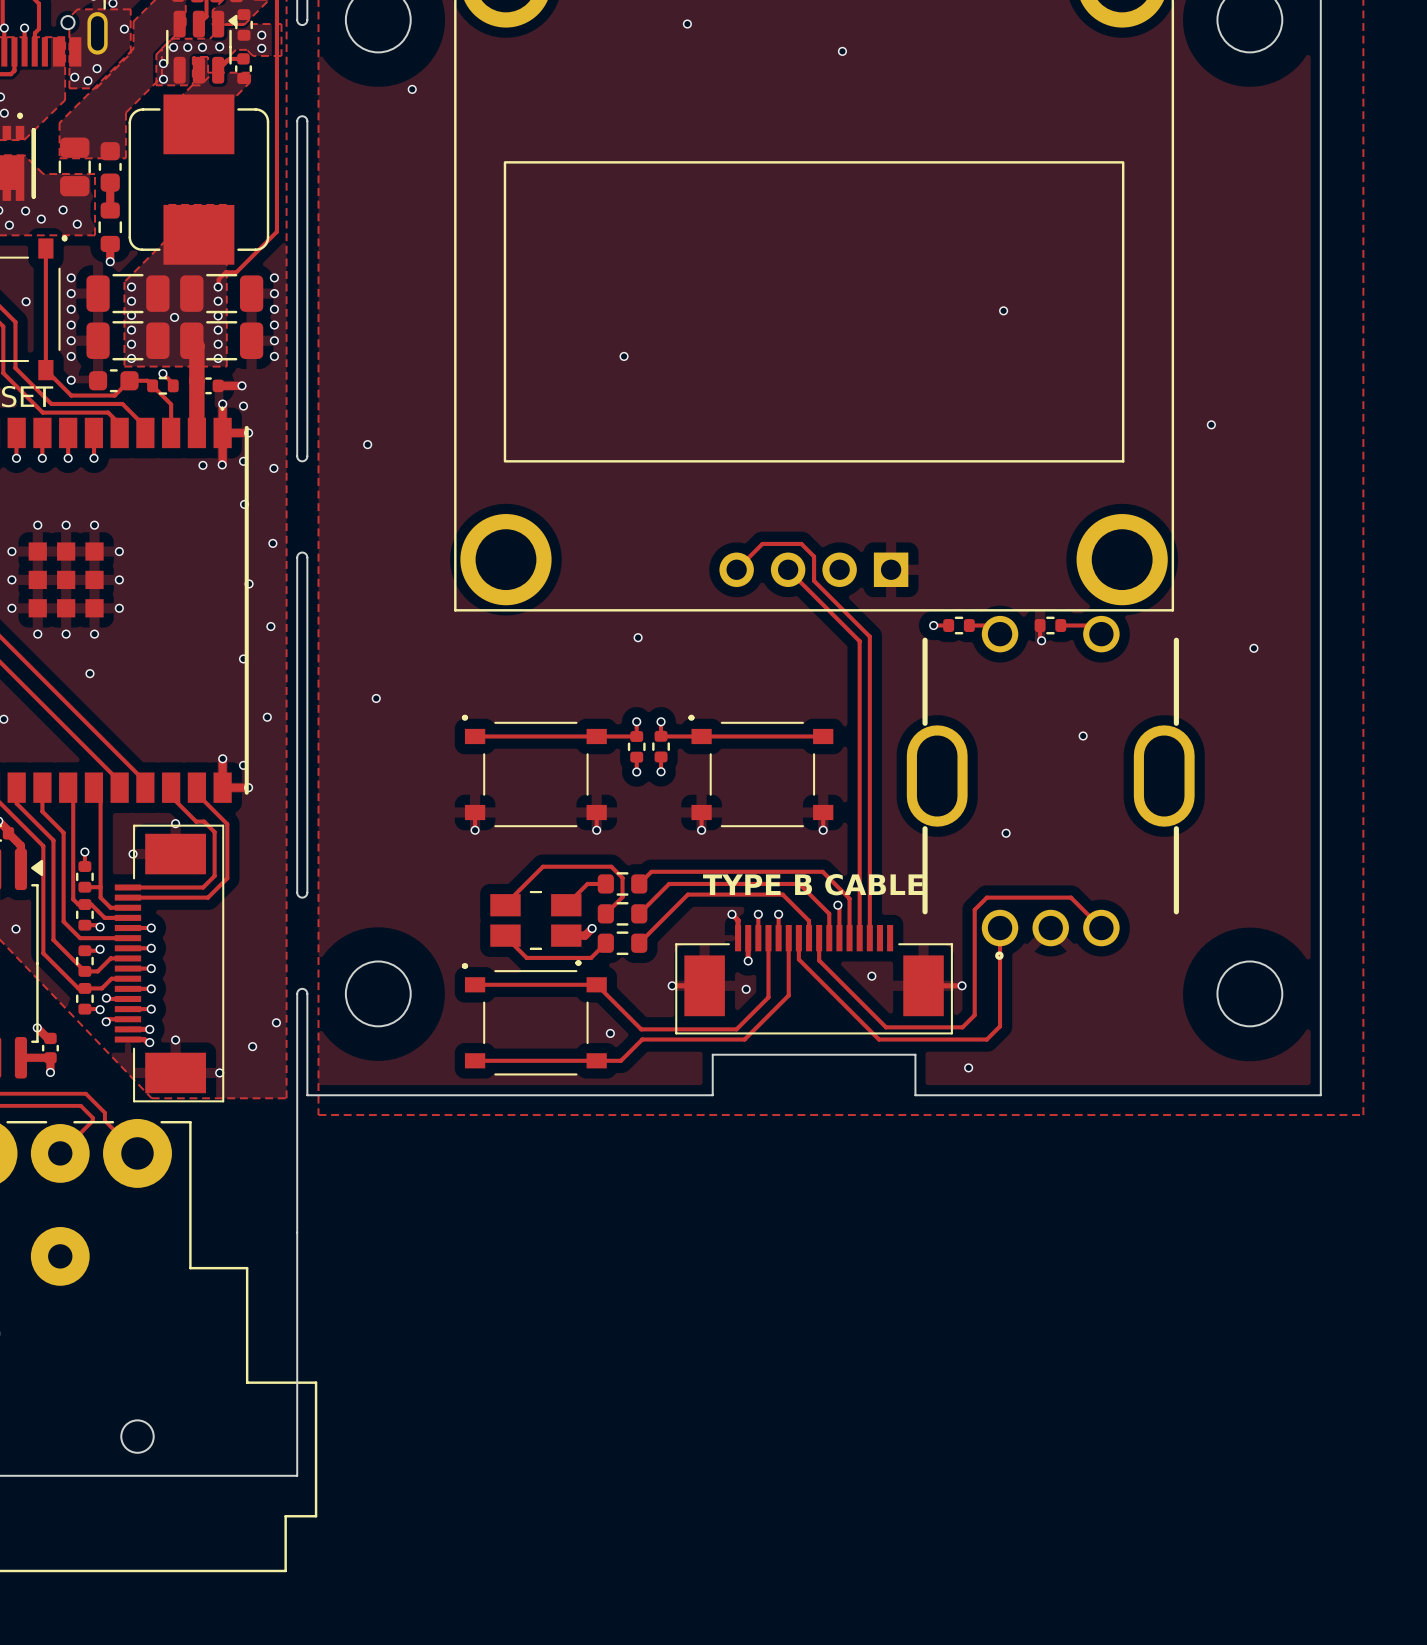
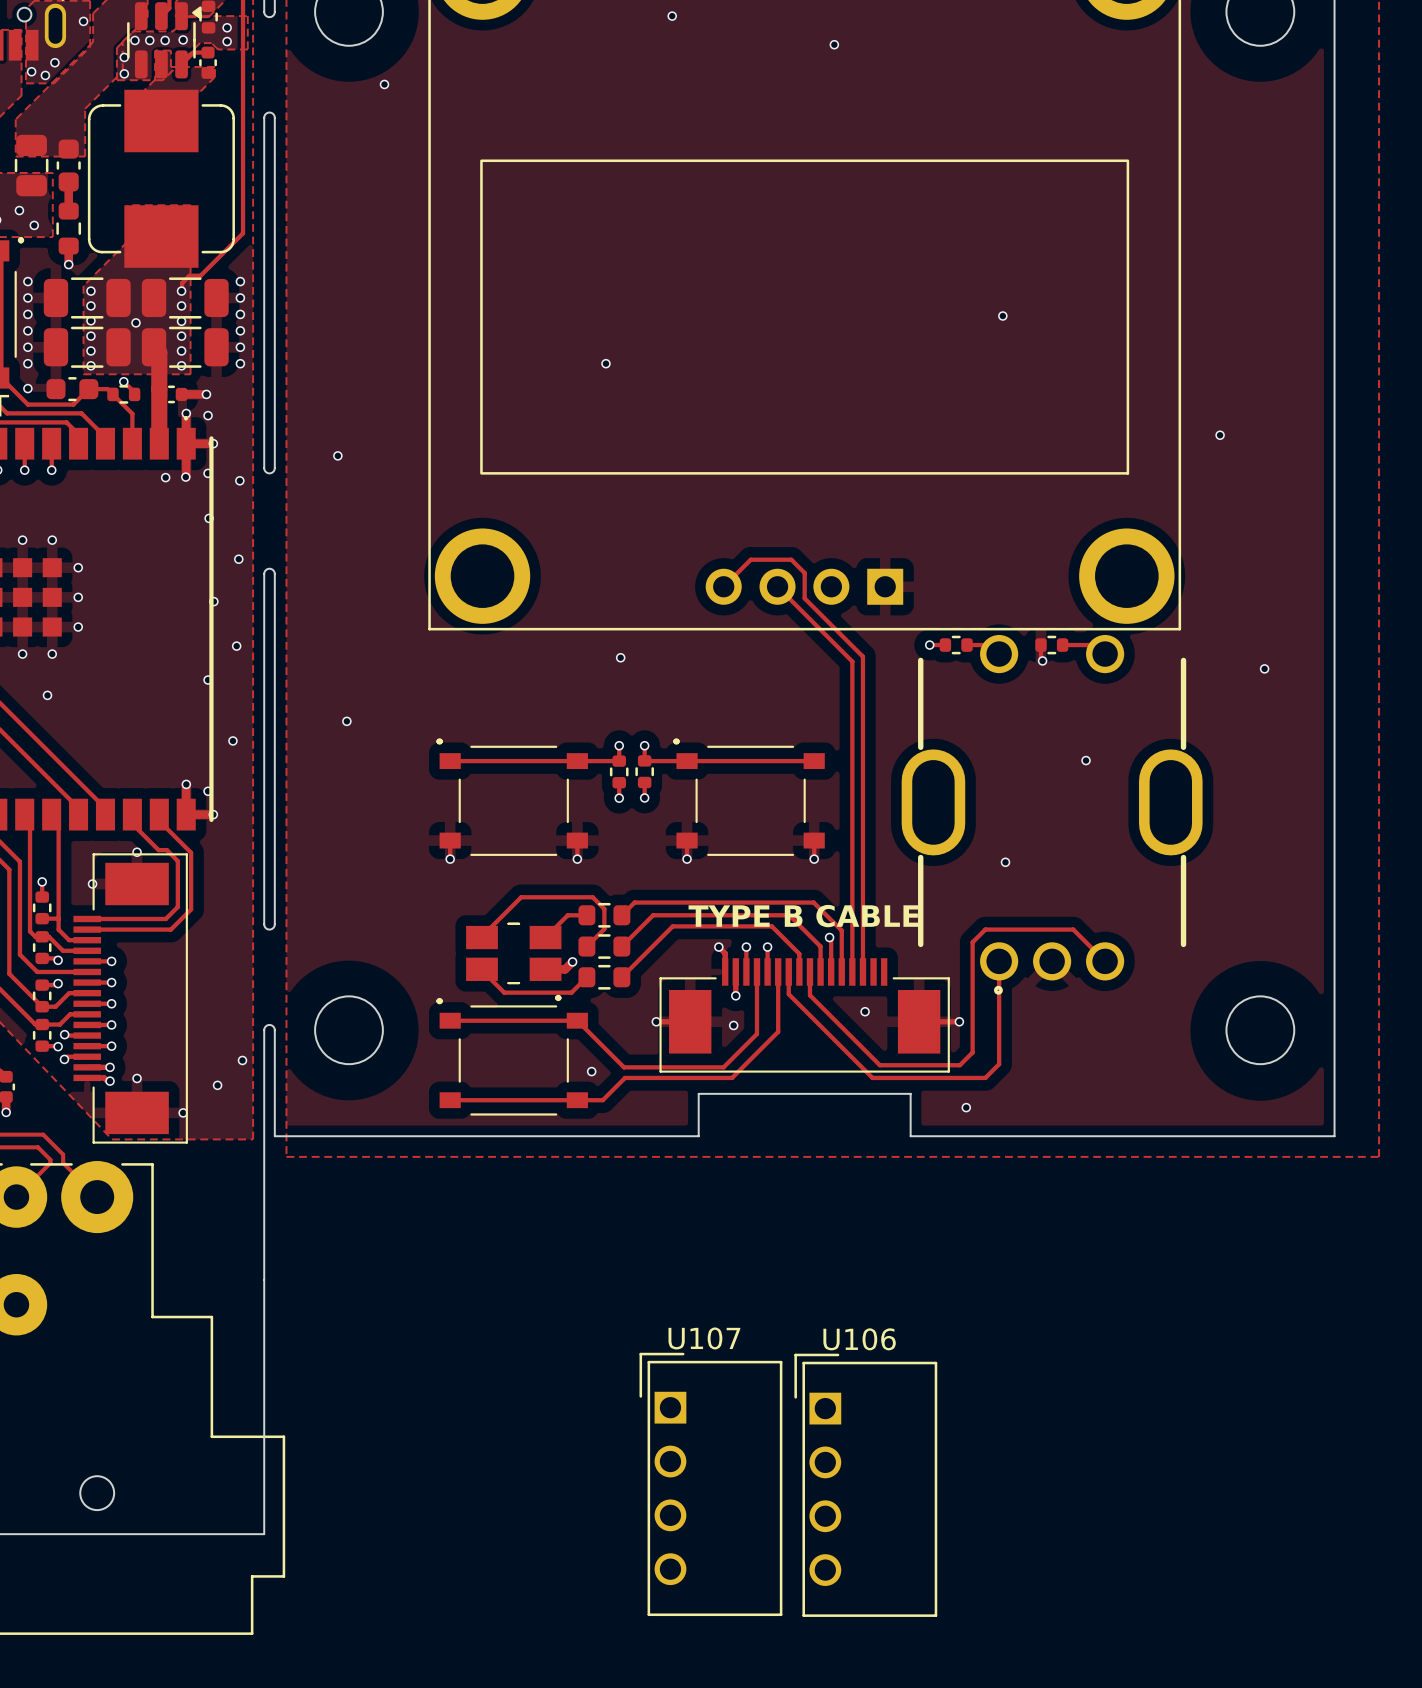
U107: none -> (710, 1484)
U106: none -> (865, 1485)

